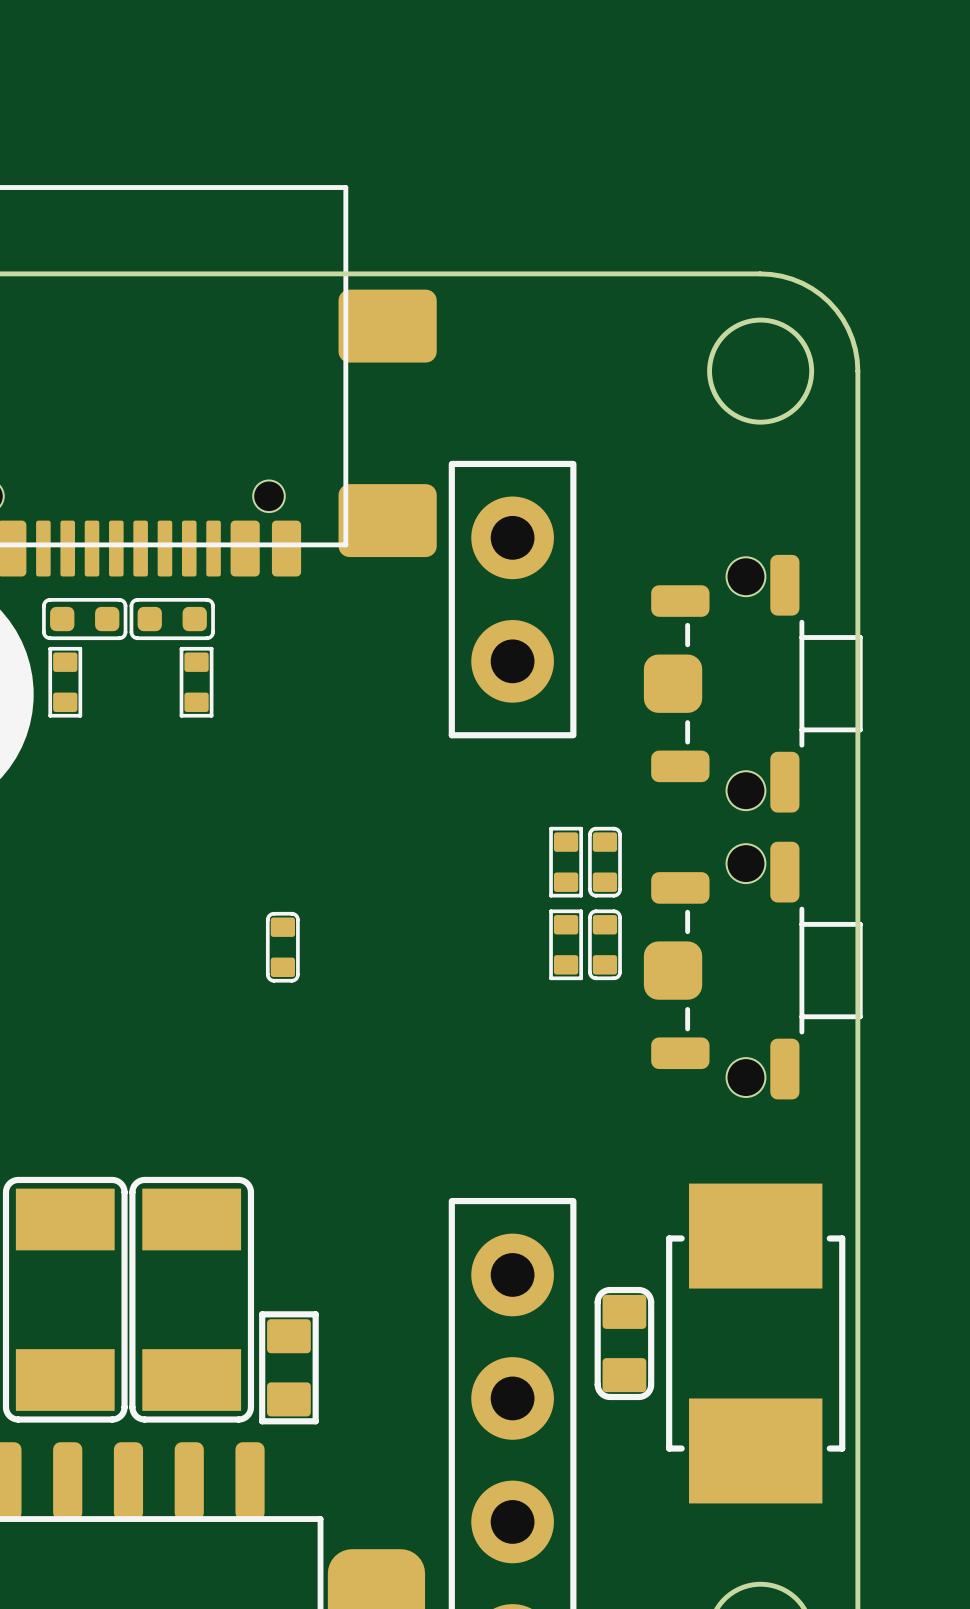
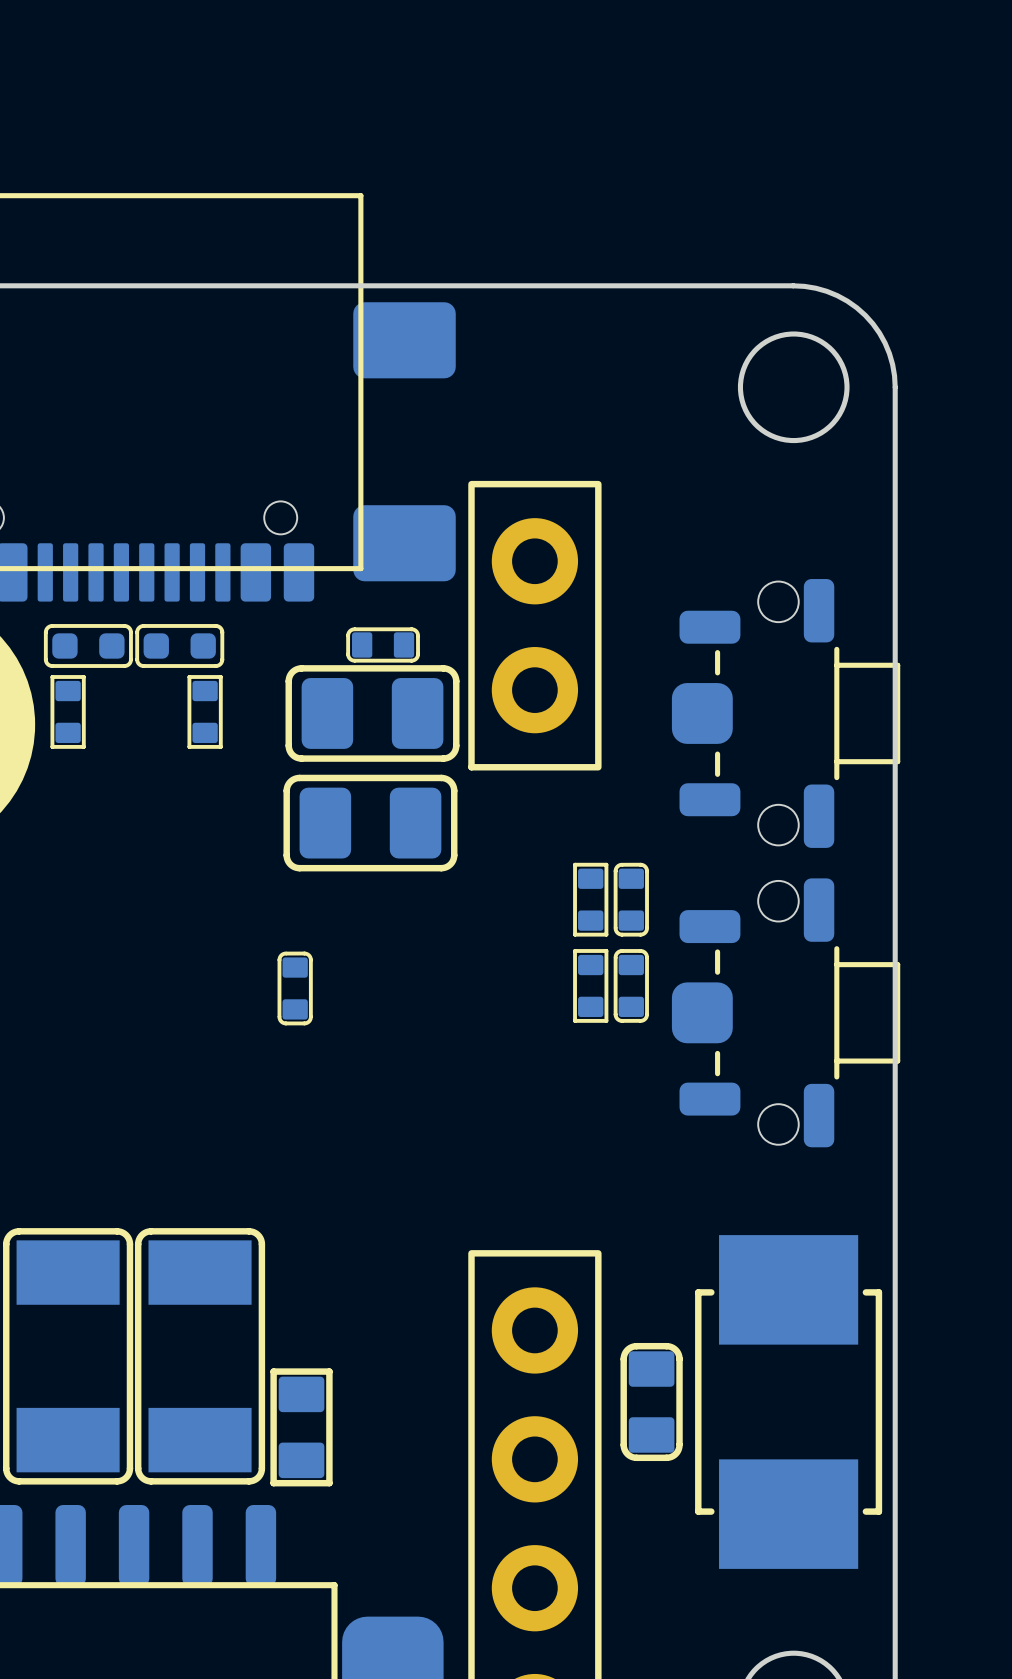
part: none -> (383, 644)
part: none -> (372, 713)
part: none -> (370, 823)

